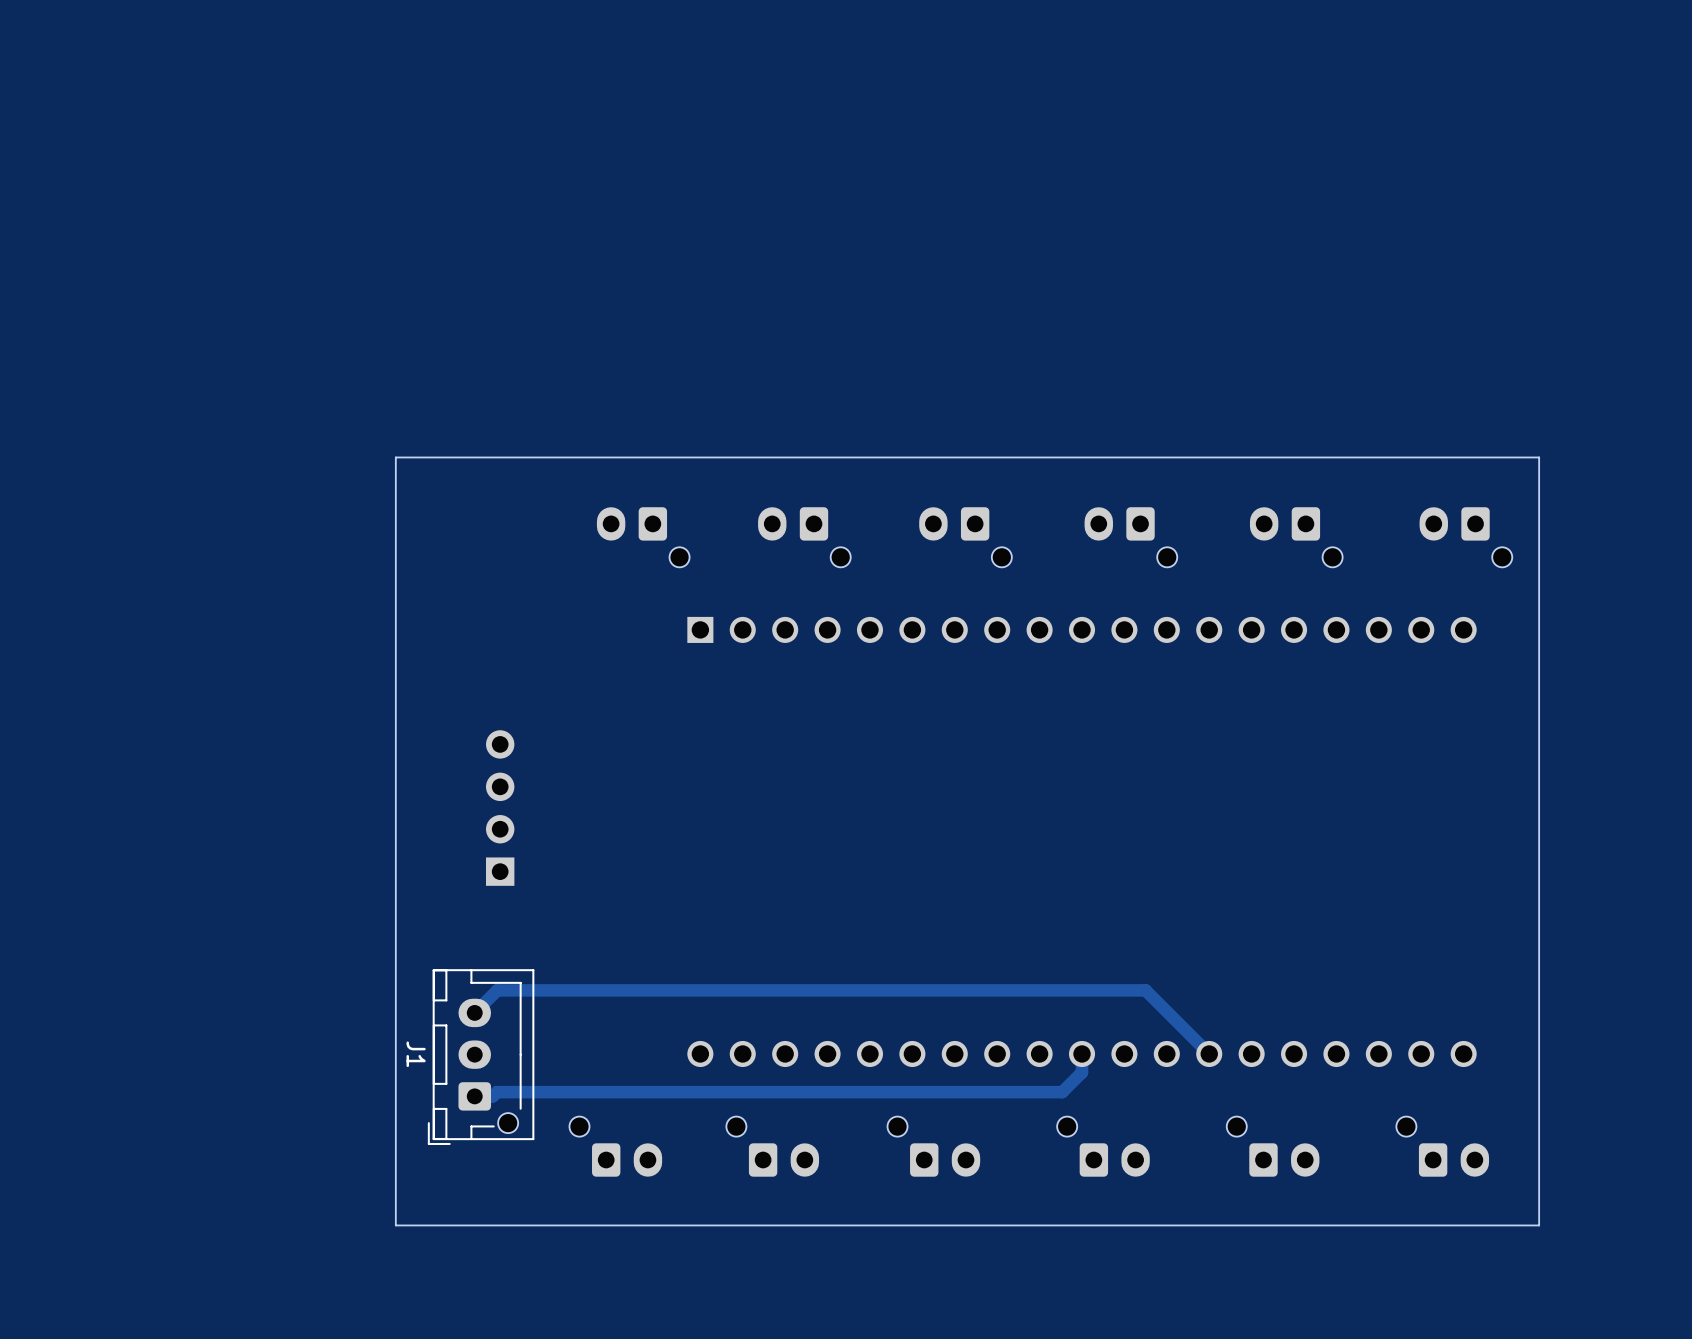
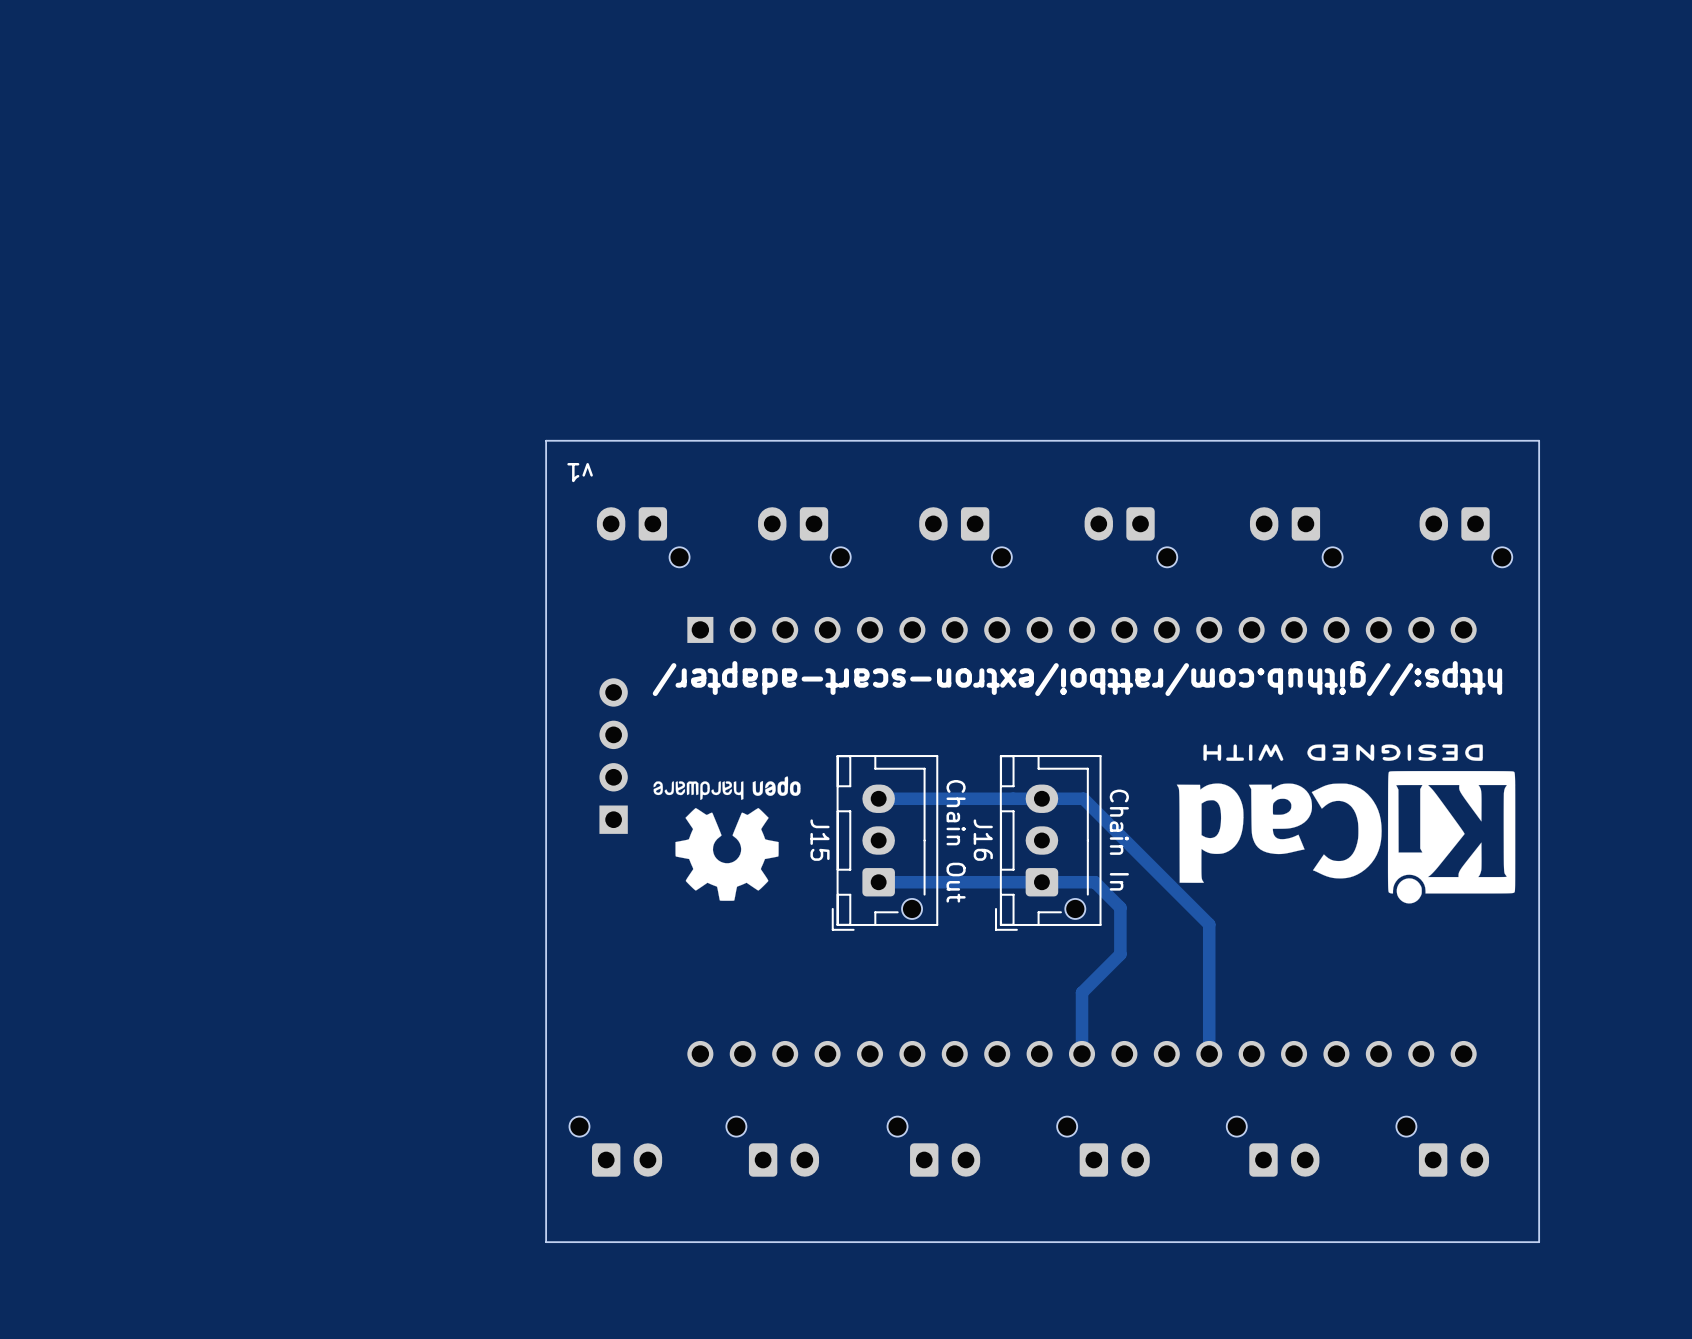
board edge: (1539, 457) (395, 457) (395, 1225) (1539, 1225) -> (1539, 457) (1539, 440) (546, 440) (546, 1242) (1539, 1242) (1539, 1225)
text: none -> v1 (580, 472)
text: none -> https://github.com/rattboi/extron-scart-adapter/ (1077, 678)
drawing: none -> [1176, 744, 1516, 904]
drawing: none -> [653, 776, 801, 901]
part position: (500, 808) -> (613, 756)
J15: none -> Chain Out (885, 842)
J16: none -> Chain In (1048, 842)
track: (474, 1012) (497, 990) (1145, 990) (1209, 1053) -> (878, 798) (1083, 798) (1209, 924) (1209, 1053)
track: (1082, 1053) (1082, 1072) (1062, 1092) (496, 1092) (492, 1096) (474, 1096) -> (1082, 1053) (1082, 992) (1120, 954) (1120, 907) (1094, 882) (878, 882)
J1: (481, 1057) -> none

